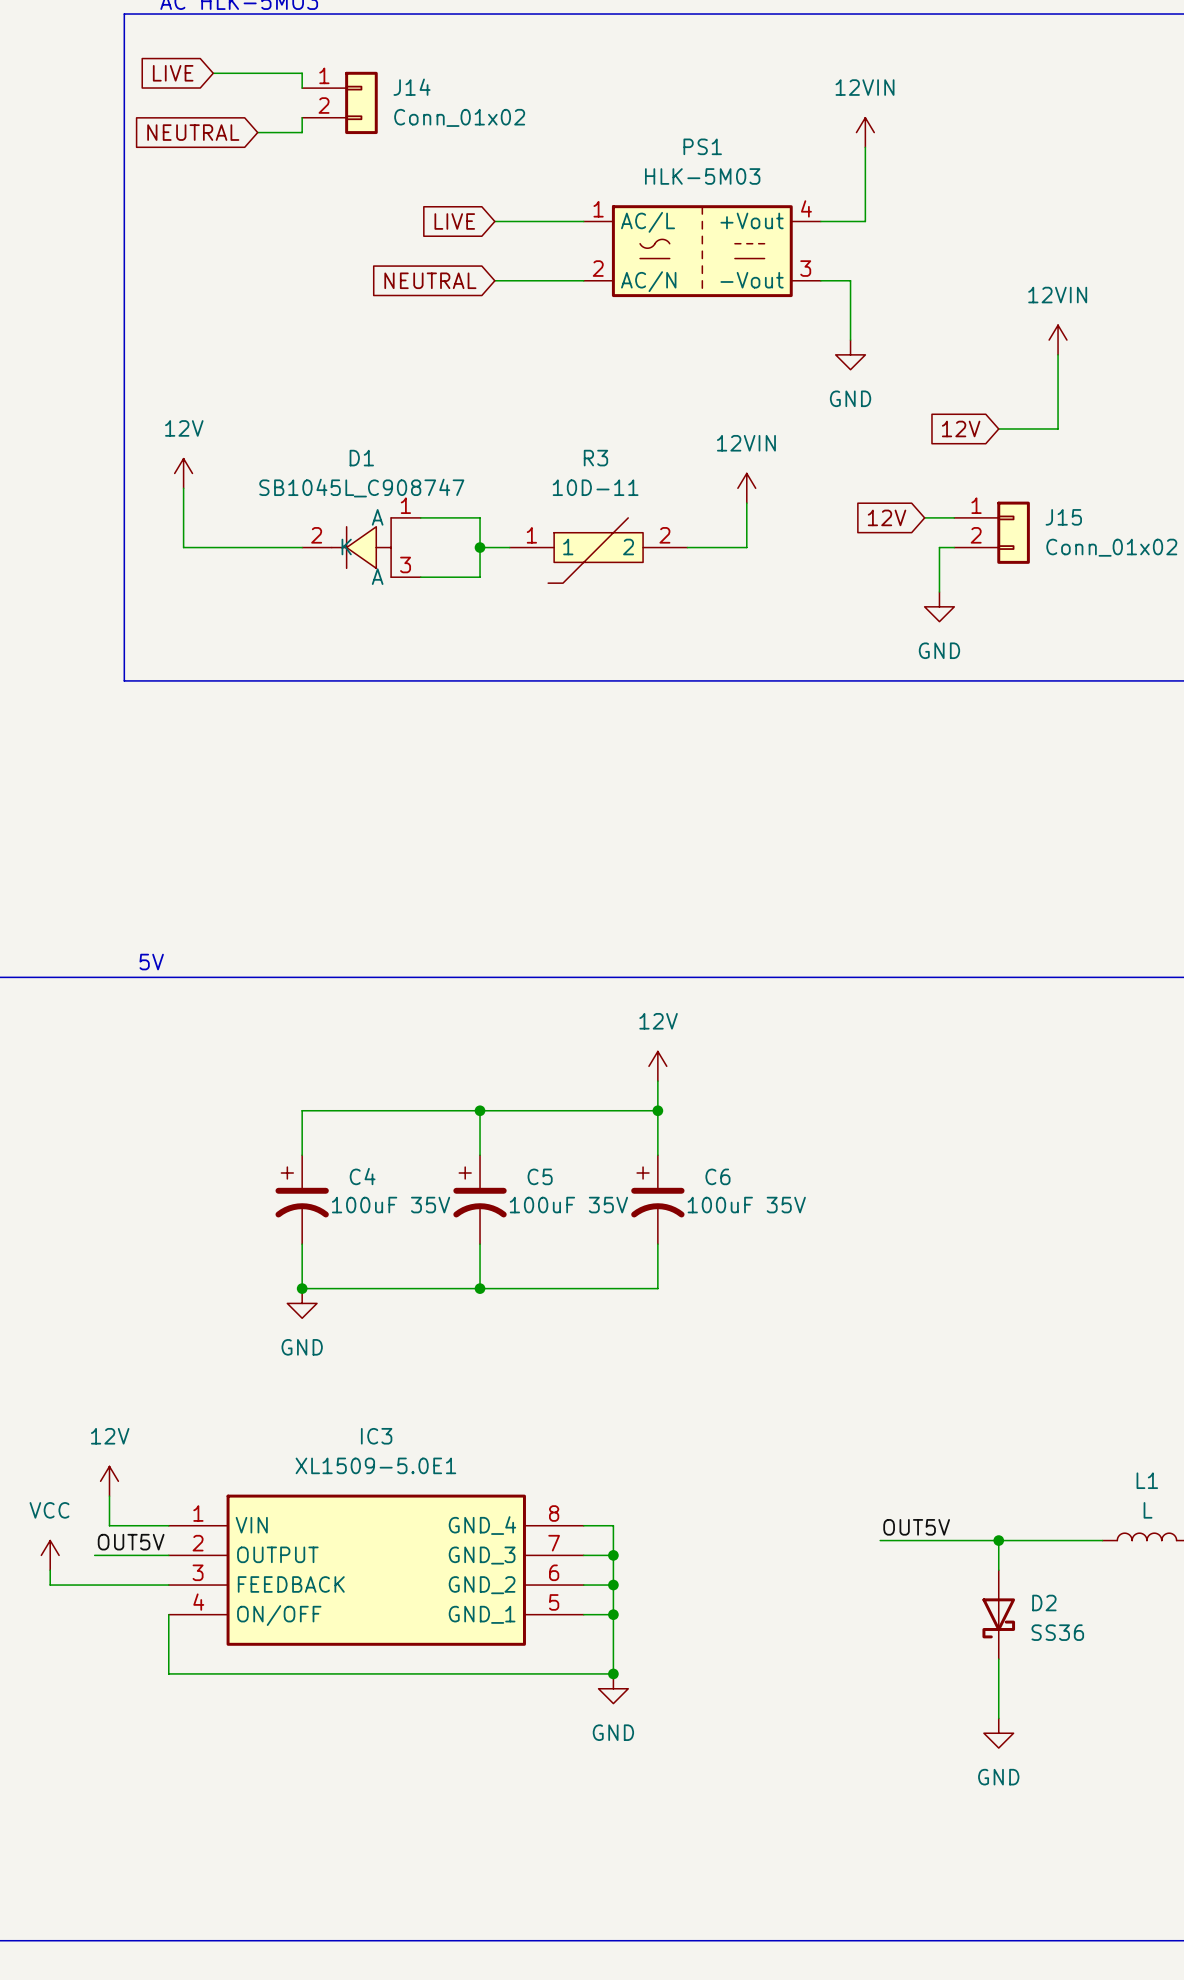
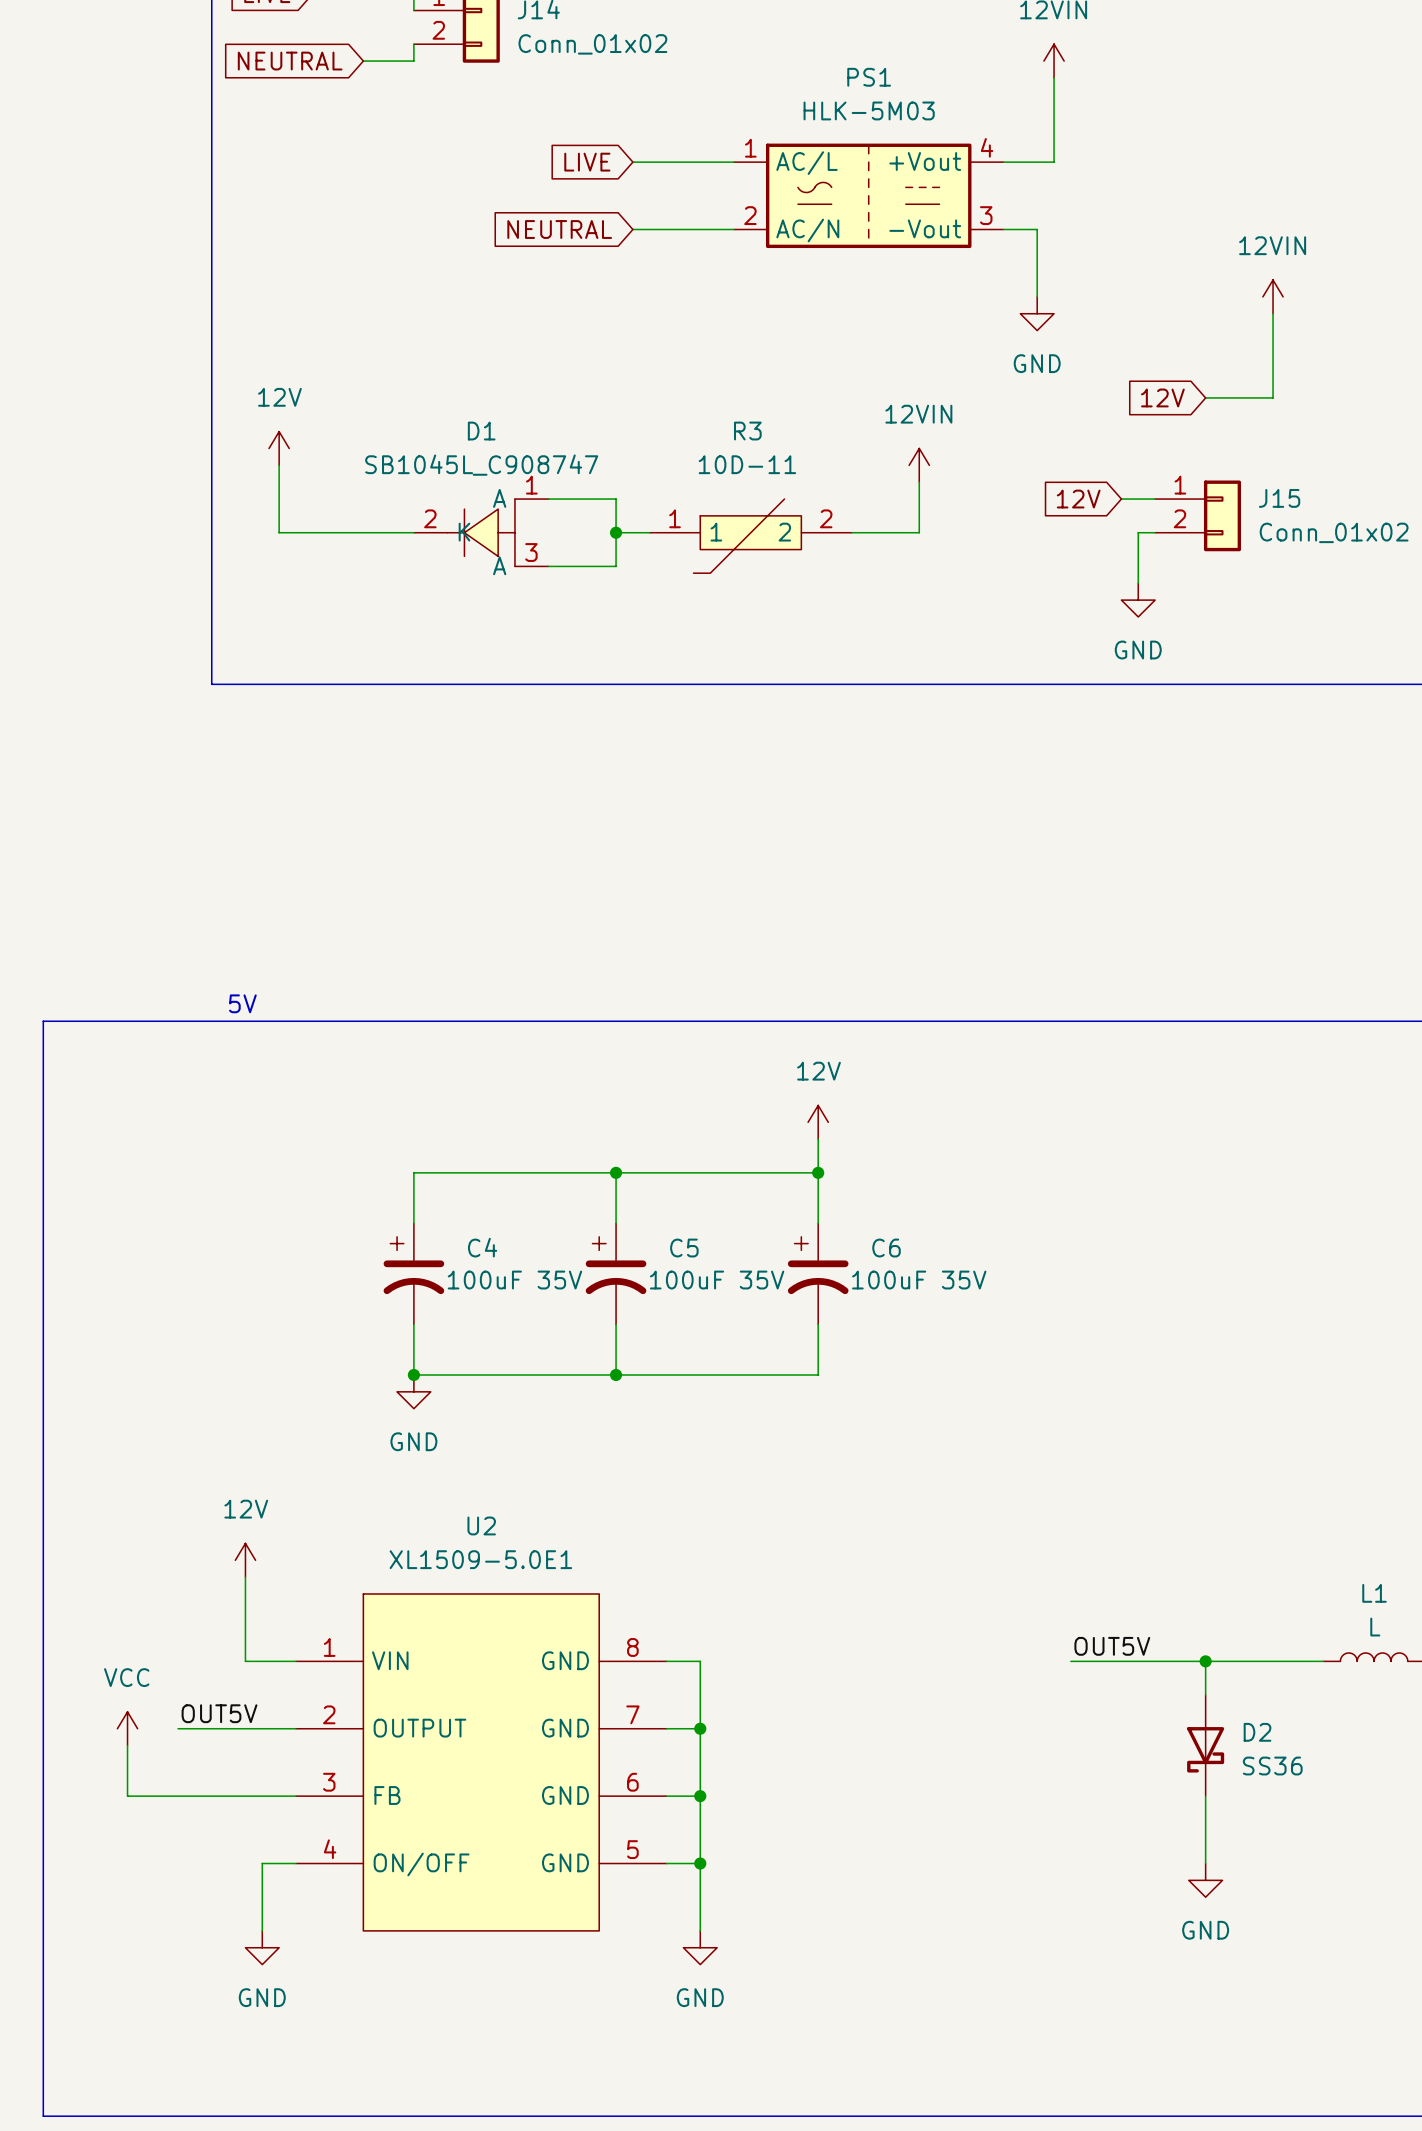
wire: none -> (245, 1577) (245, 1661) (295, 1661)
power symbol position: 12V (109, 1481) -> 12V (245, 1560)
wire: (109, 1496) (109, 1525) (168, 1525) -> none
wire: (583, 1525) (613, 1525) (613, 1673) (168, 1673) (168, 1614) -> none
wire: none -> (666, 1661) (700, 1661) (700, 1930)
label position: OUT5V (131, 1542) -> OUT5V (219, 1713)
power symbol position: VCC (50, 1555) -> VCC (127, 1728)
wire: (94, 1555) (168, 1555) -> none
wire: (583, 1555) (613, 1555) -> (666, 1728) (700, 1728)
junction: (613, 1555) -> none
wire: (50, 1570) (50, 1585) (168, 1585) -> none
IC3: XL1509-5.0E1 (376, 1570) -> none
wire: (583, 1585) (613, 1585) -> (666, 1863) (700, 1863)
junction: (613, 1585) -> none
wire: none -> (178, 1728) (295, 1728)
junction: none -> (700, 1728)
wire: none -> (127, 1745) (127, 1796) (295, 1796)
wire: (583, 1614) (613, 1614) -> (666, 1796) (700, 1796)
junction: (613, 1614) -> none
U2: none -> XL1509-5.0E1 (481, 1762)
junction: none -> (700, 1796)
junction: (613, 1673) -> none
power symbol position: GND (613, 1688) -> GND (700, 1947)
wire: none -> (295, 1863) (262, 1863) (262, 1930)
junction: none -> (700, 1863)
power symbol: none -> GND (262, 1947)

